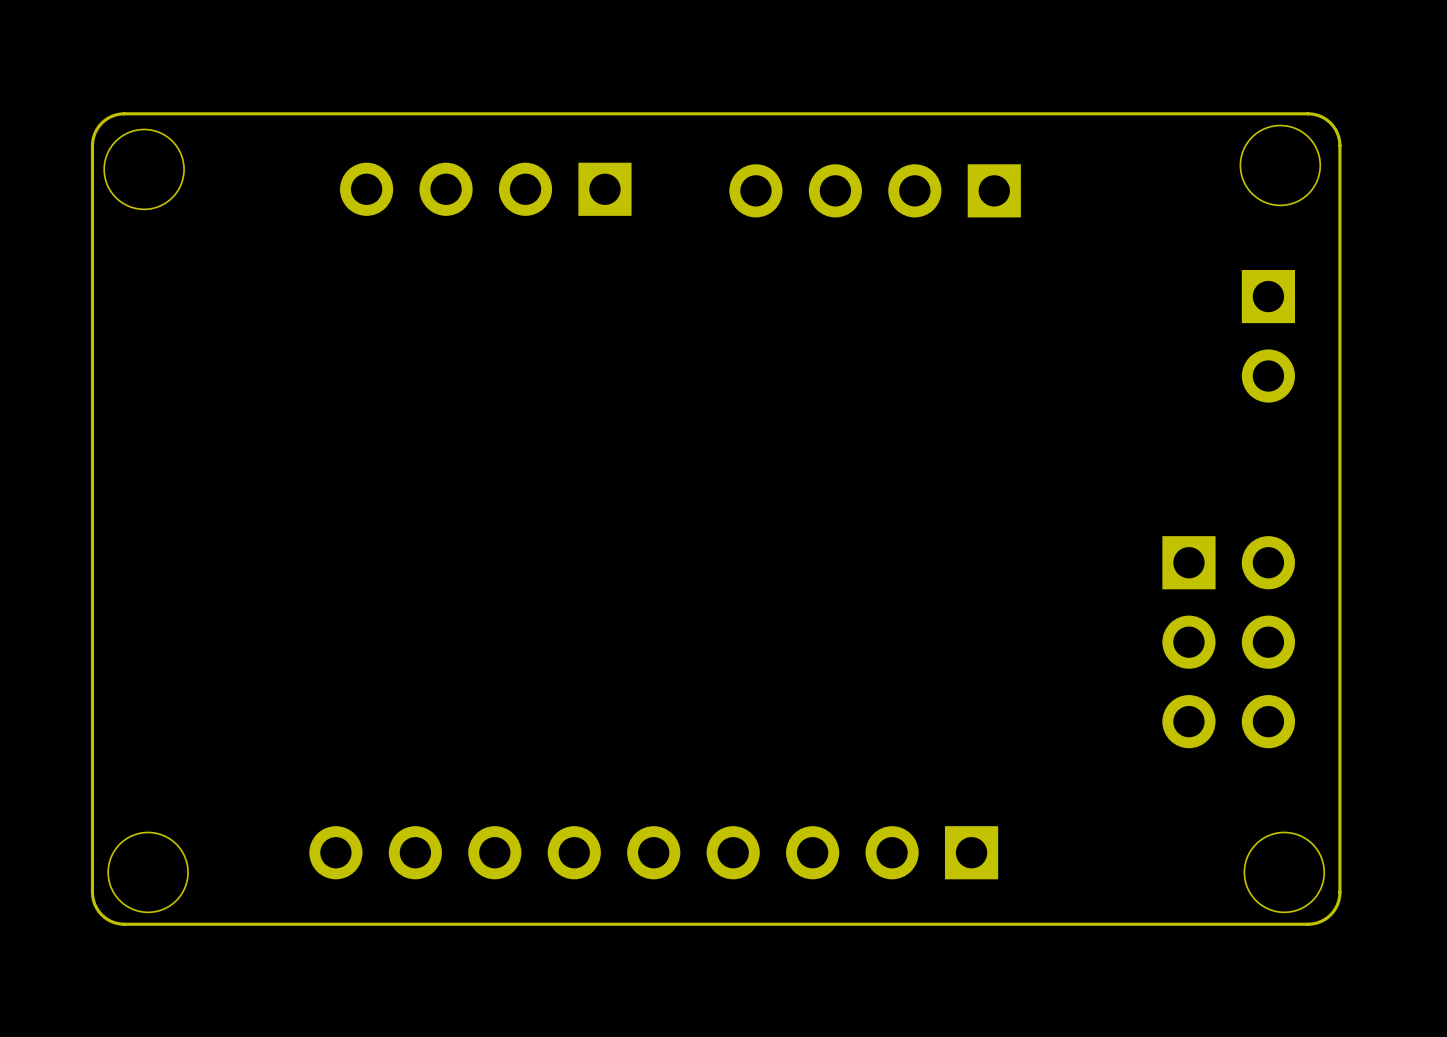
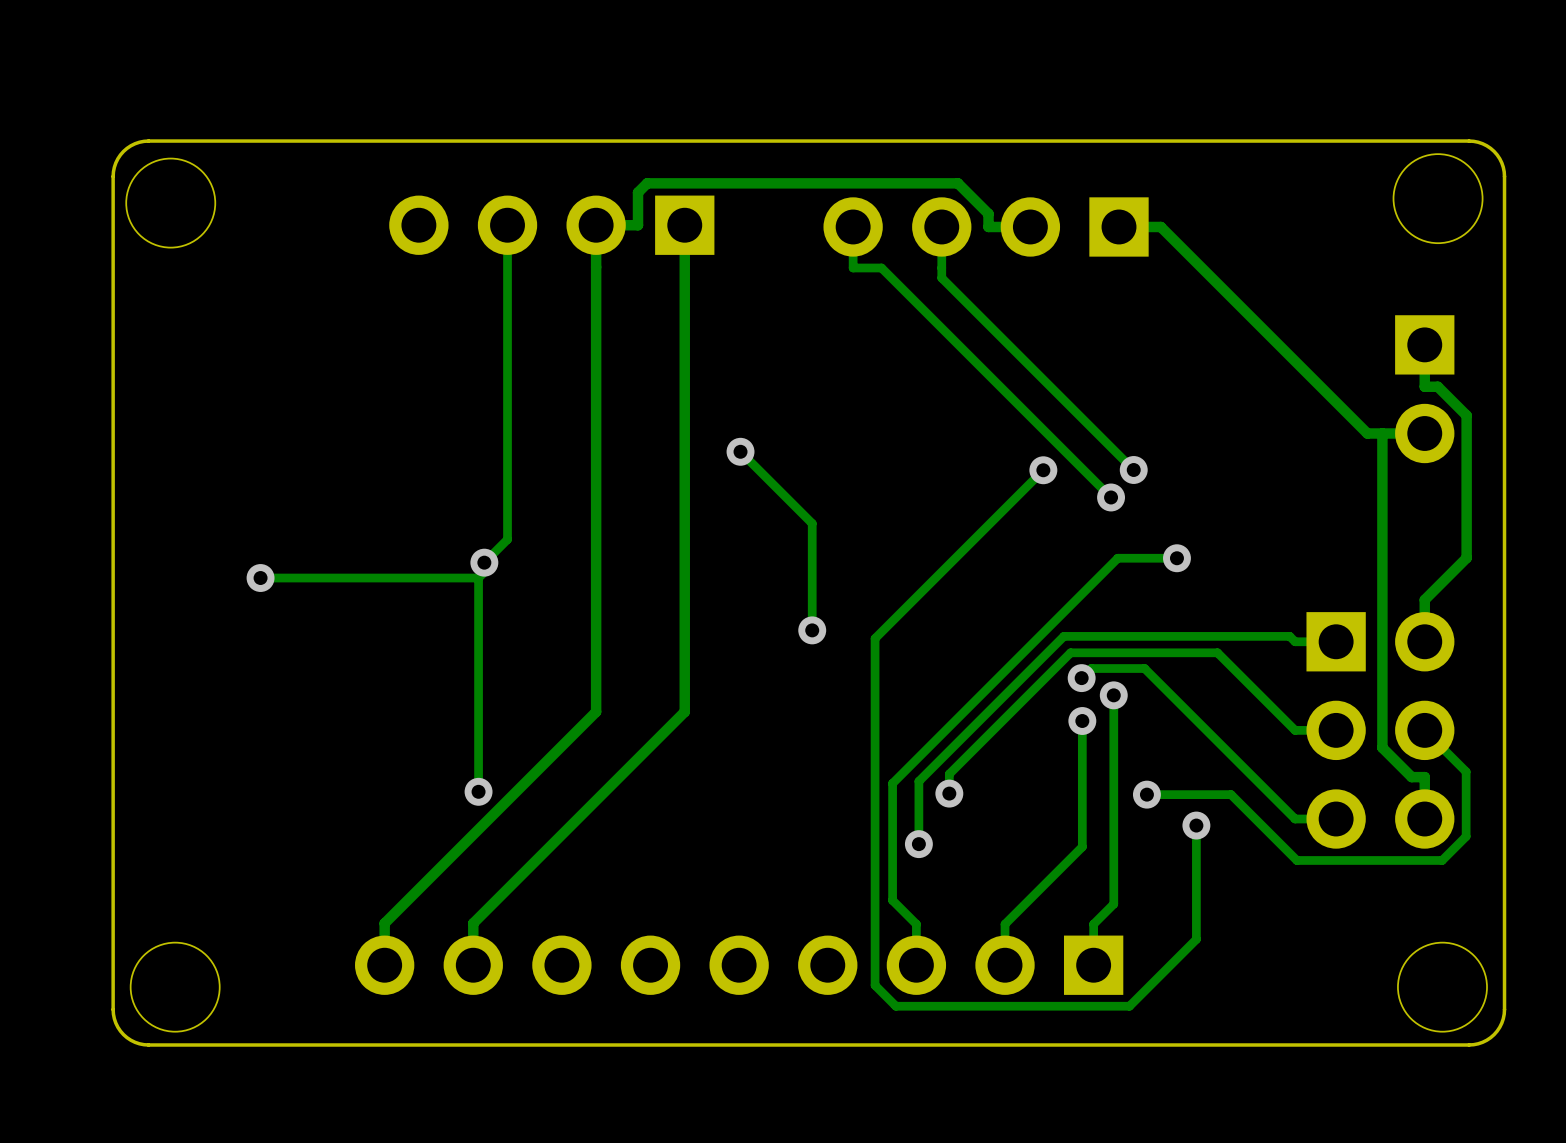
track: none -> (507, 225) (507, 539) (484, 562) (484, 572) (478, 578)
track: none -> (684, 225) (684, 711) (473, 923) (473, 965)
track: none -> (853, 226) (853, 267) (881, 267) (1111, 497)
track: none -> (941, 226) (941, 278) (1133, 469)
track: none -> (1030, 226) (988, 226) (988, 213) (957, 183) (647, 183) (638, 192) (638, 225) (596, 225) (596, 711) (384, 923) (384, 965)
track: none -> (1119, 226) (1160, 226) (1367, 433) (1424, 433)
track: none -> (1424, 344) (1424, 386) (1437, 386) (1466, 415) (1466, 558) (1424, 599) (1424, 641)
track: none -> (1382, 433) (1382, 747) (1411, 777) (1424, 777) (1424, 819)
track: none -> (740, 451) (812, 523) (812, 630)
via: none -> (740, 451)
track: none -> (1043, 470) (875, 638) (875, 985) (895, 1006) (1129, 1006) (1196, 939) (1196, 825)
via: none -> (1043, 470)
via: none -> (1133, 469)
via: none -> (1111, 497)
track: none -> (1176, 558) (1117, 558) (892, 783) (892, 900) (916, 924) (916, 965)
via: none -> (1176, 558)
via: none -> (484, 562)
via: none -> (260, 578)
track: none -> (478, 578) (260, 578)
track: none -> (478, 578) (478, 791)
via: none -> (812, 630)
track: none -> (1336, 641) (1295, 641) (1289, 636) (1063, 636) (918, 781) (918, 844)
track: none -> (1081, 678) (1091, 668) (1144, 668) (1295, 819) (1336, 819)
via: none -> (1081, 678)
track: none -> (1113, 695) (1113, 904) (1093, 924) (1093, 965)
via: none -> (1113, 695)
track: none -> (1082, 721) (1082, 846) (1005, 924) (1005, 965)
via: none -> (1082, 721)
track: none -> (1336, 730) (1295, 730) (1217, 652) (1070, 652) (949, 774) (949, 793)
track: none -> (1424, 730) (1466, 771) (1466, 836) (1442, 860) (1296, 860) (1231, 794) (1146, 794)
via: none -> (478, 791)
via: none -> (949, 793)
via: none -> (1146, 794)
via: none -> (1196, 825)
via: none -> (918, 844)

